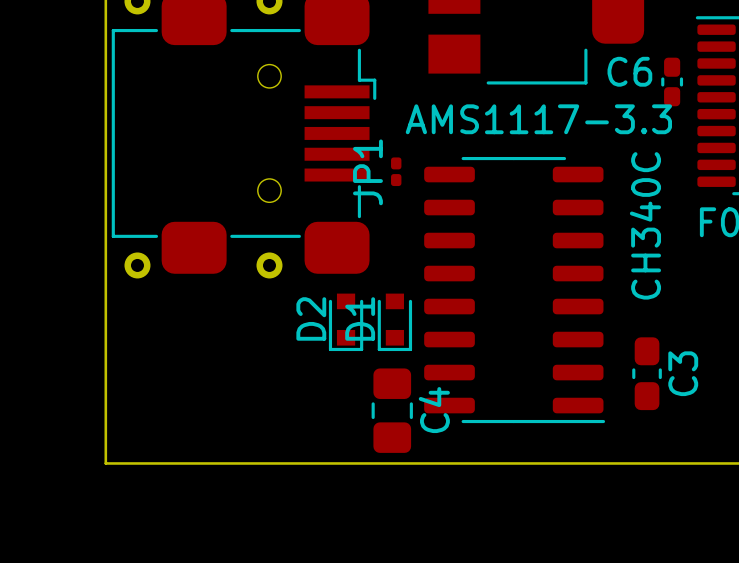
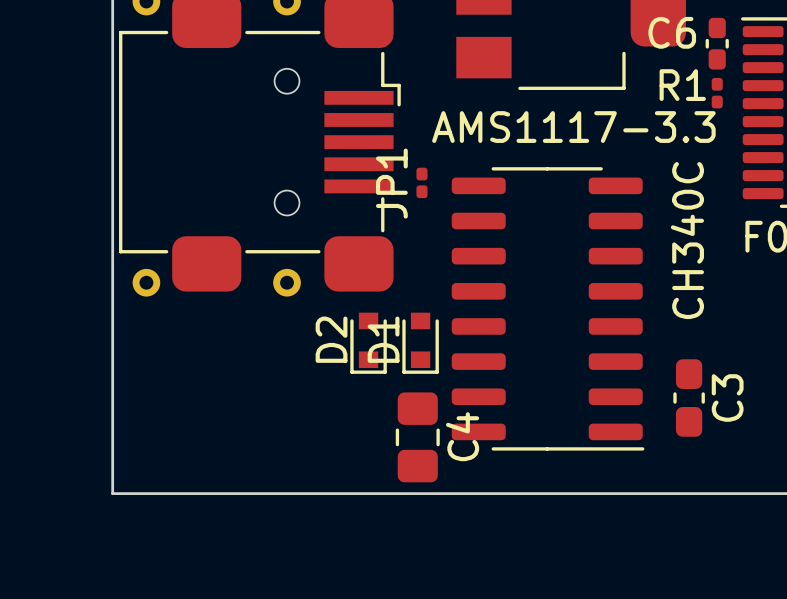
C6 position: (672, 81) -> (717, 43)
R1: none -> (717, 93)

